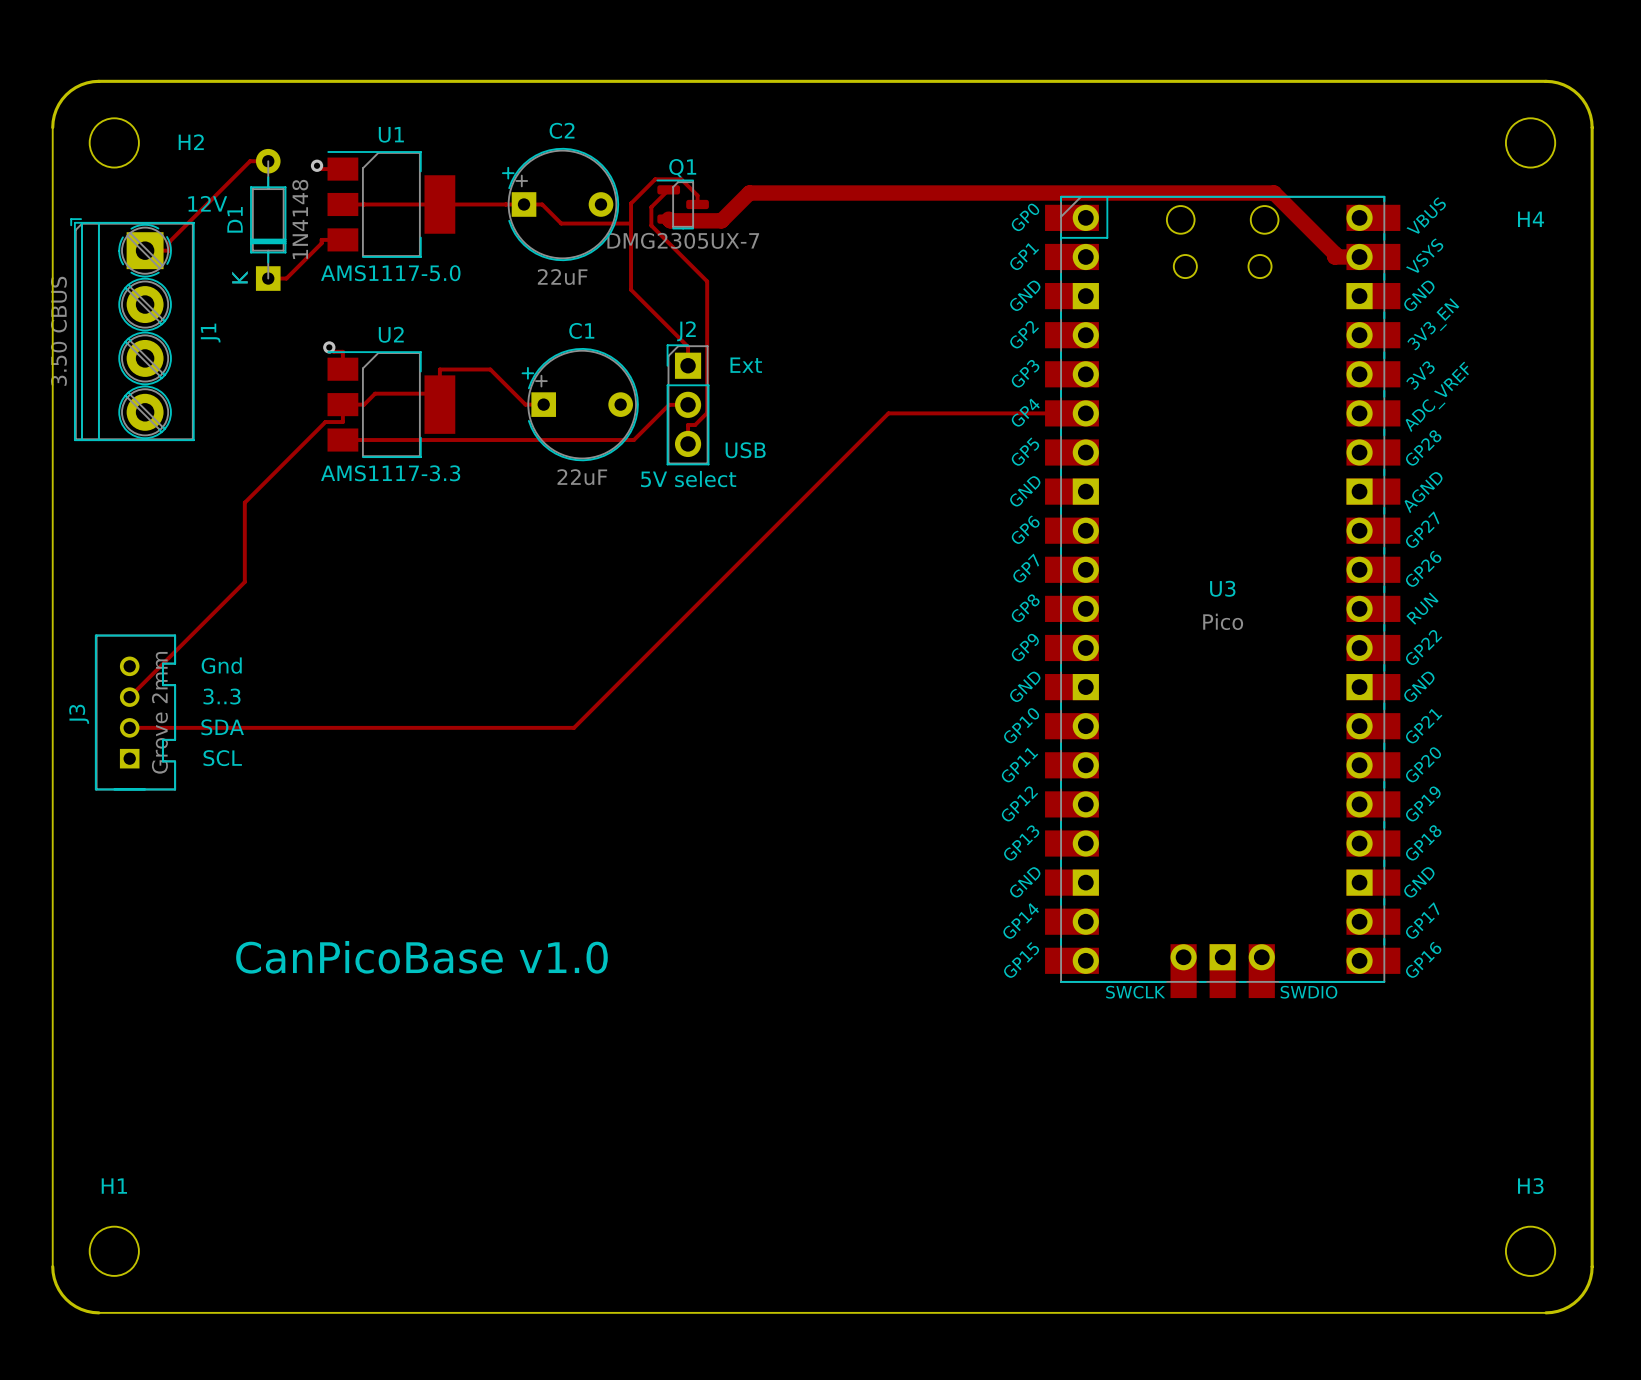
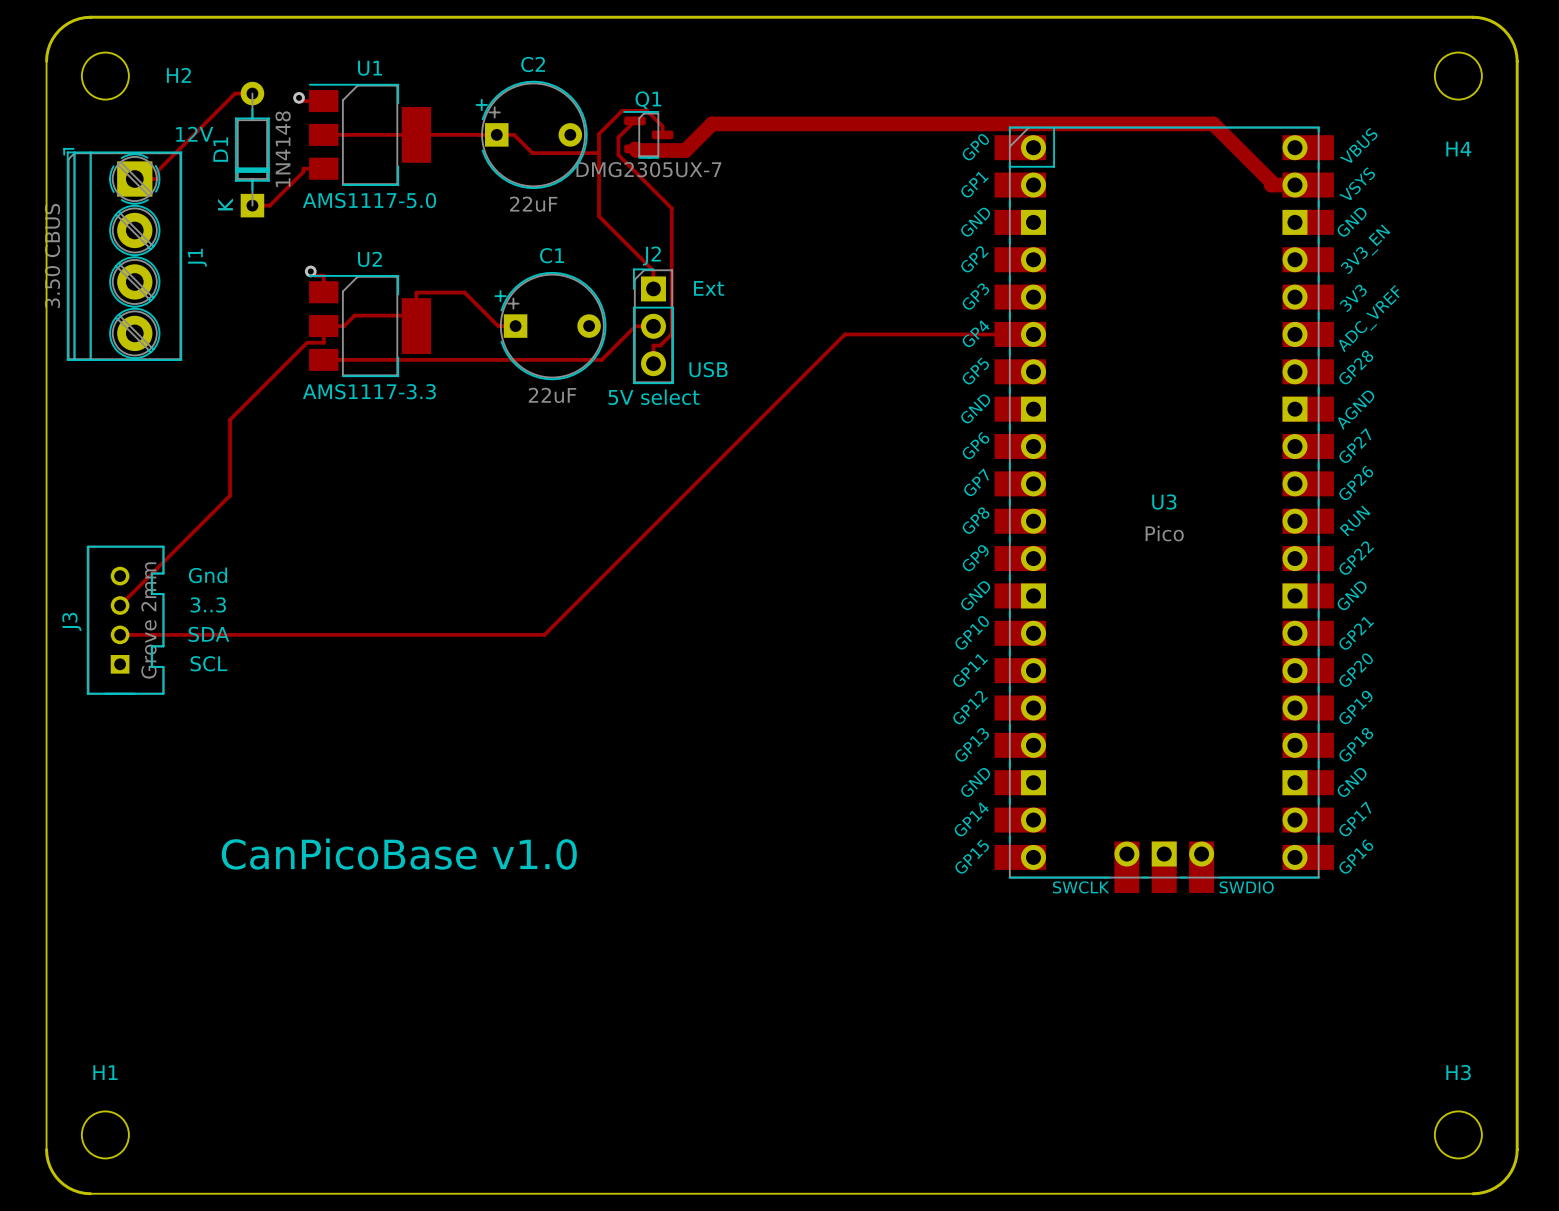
U3 footprint: [1045, 195, 1401, 999] -> [994, 126, 1334, 894]

